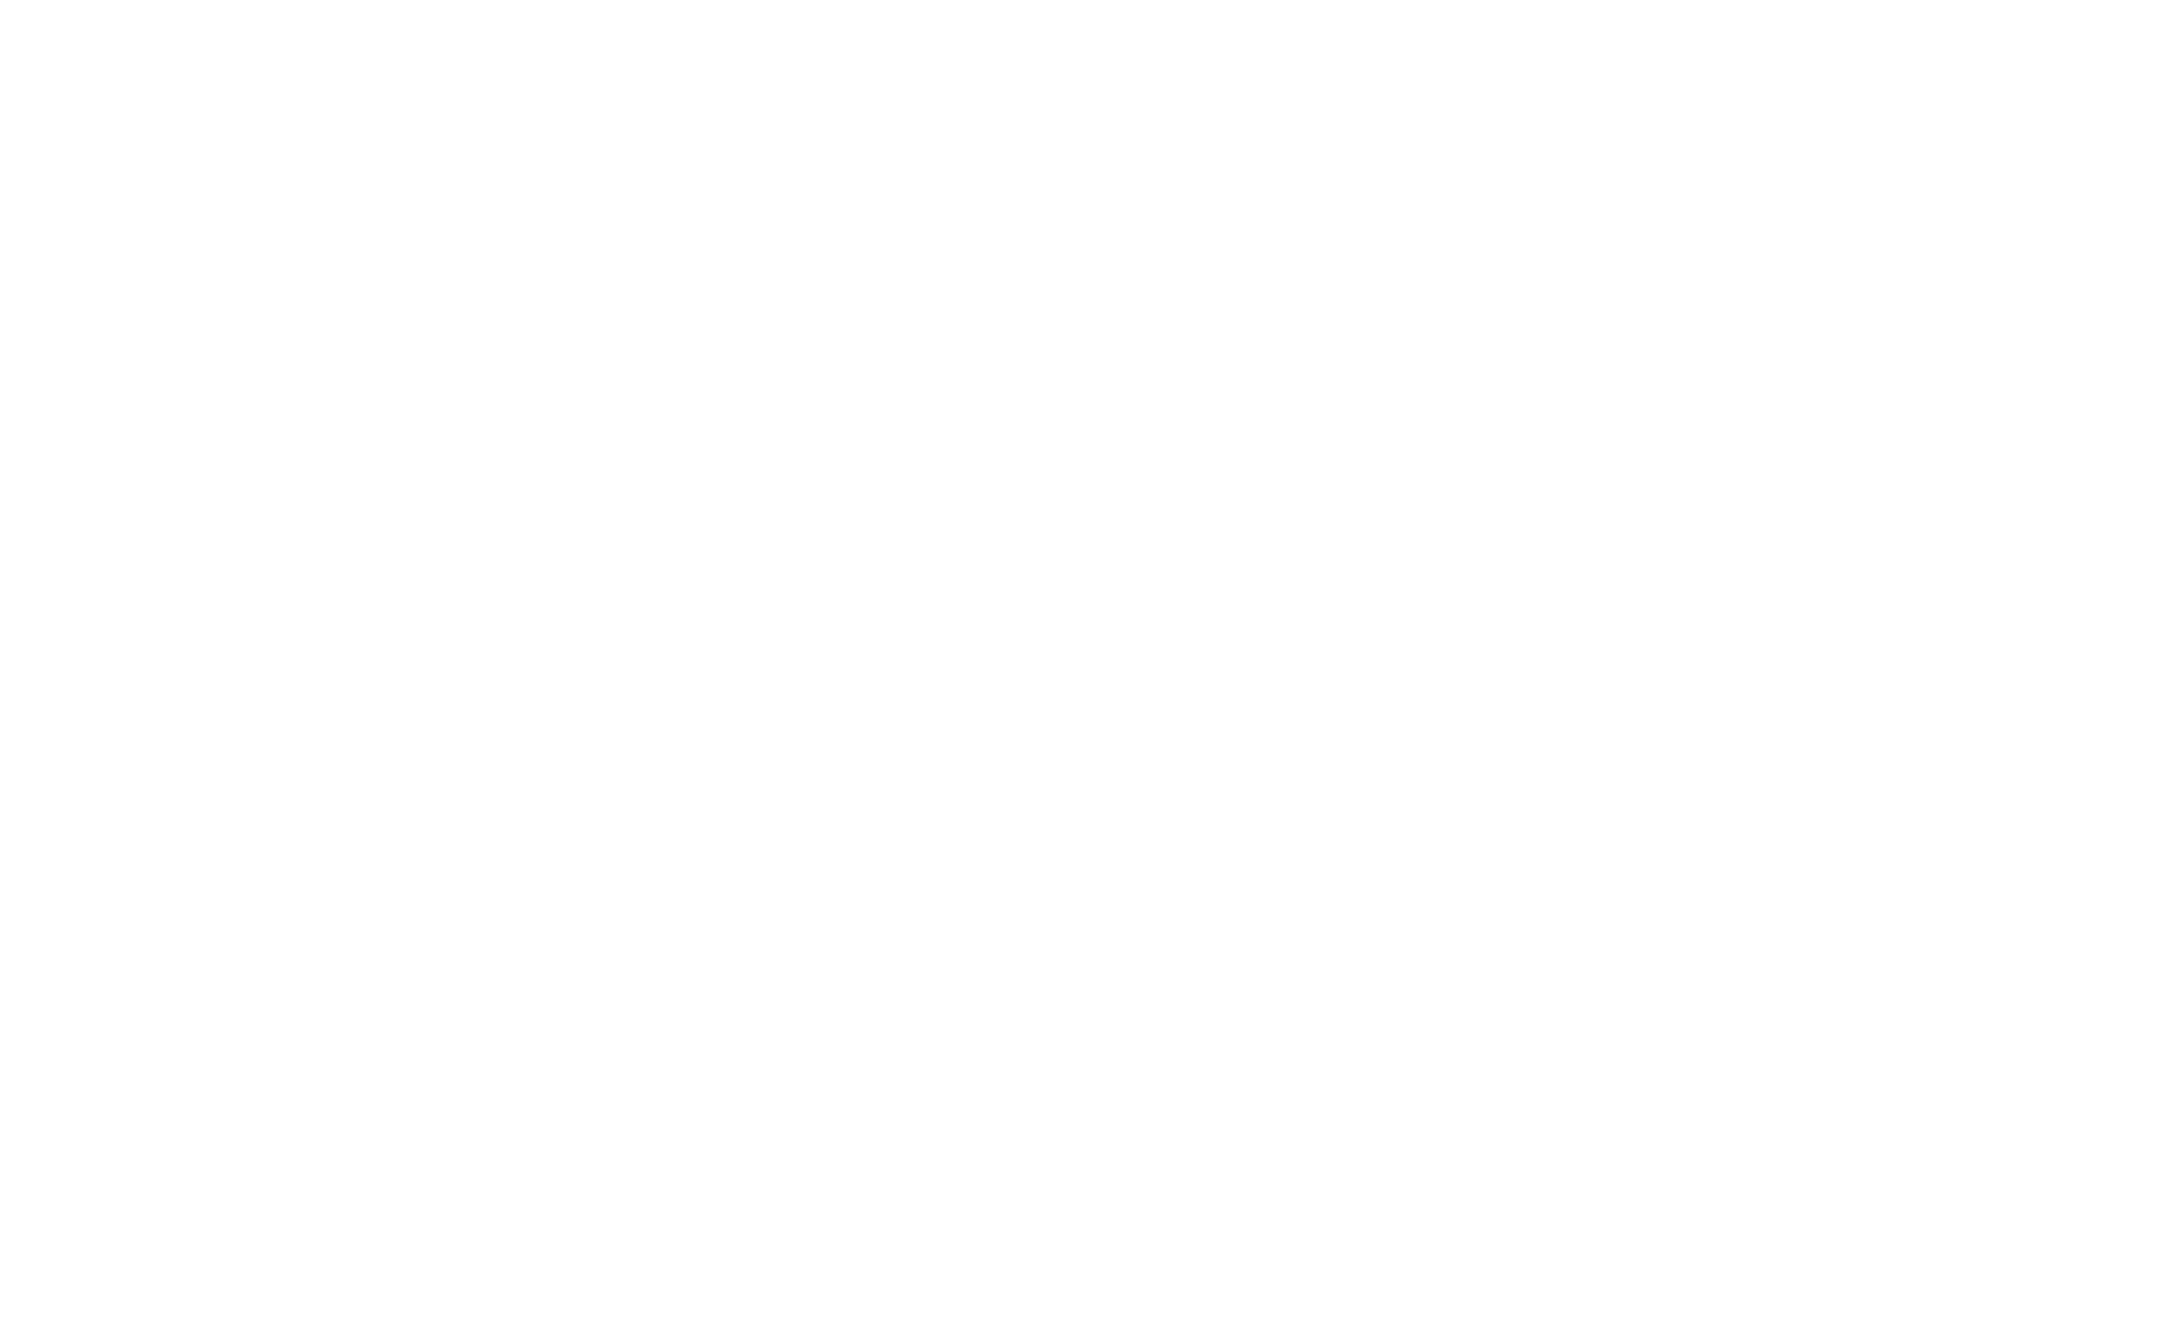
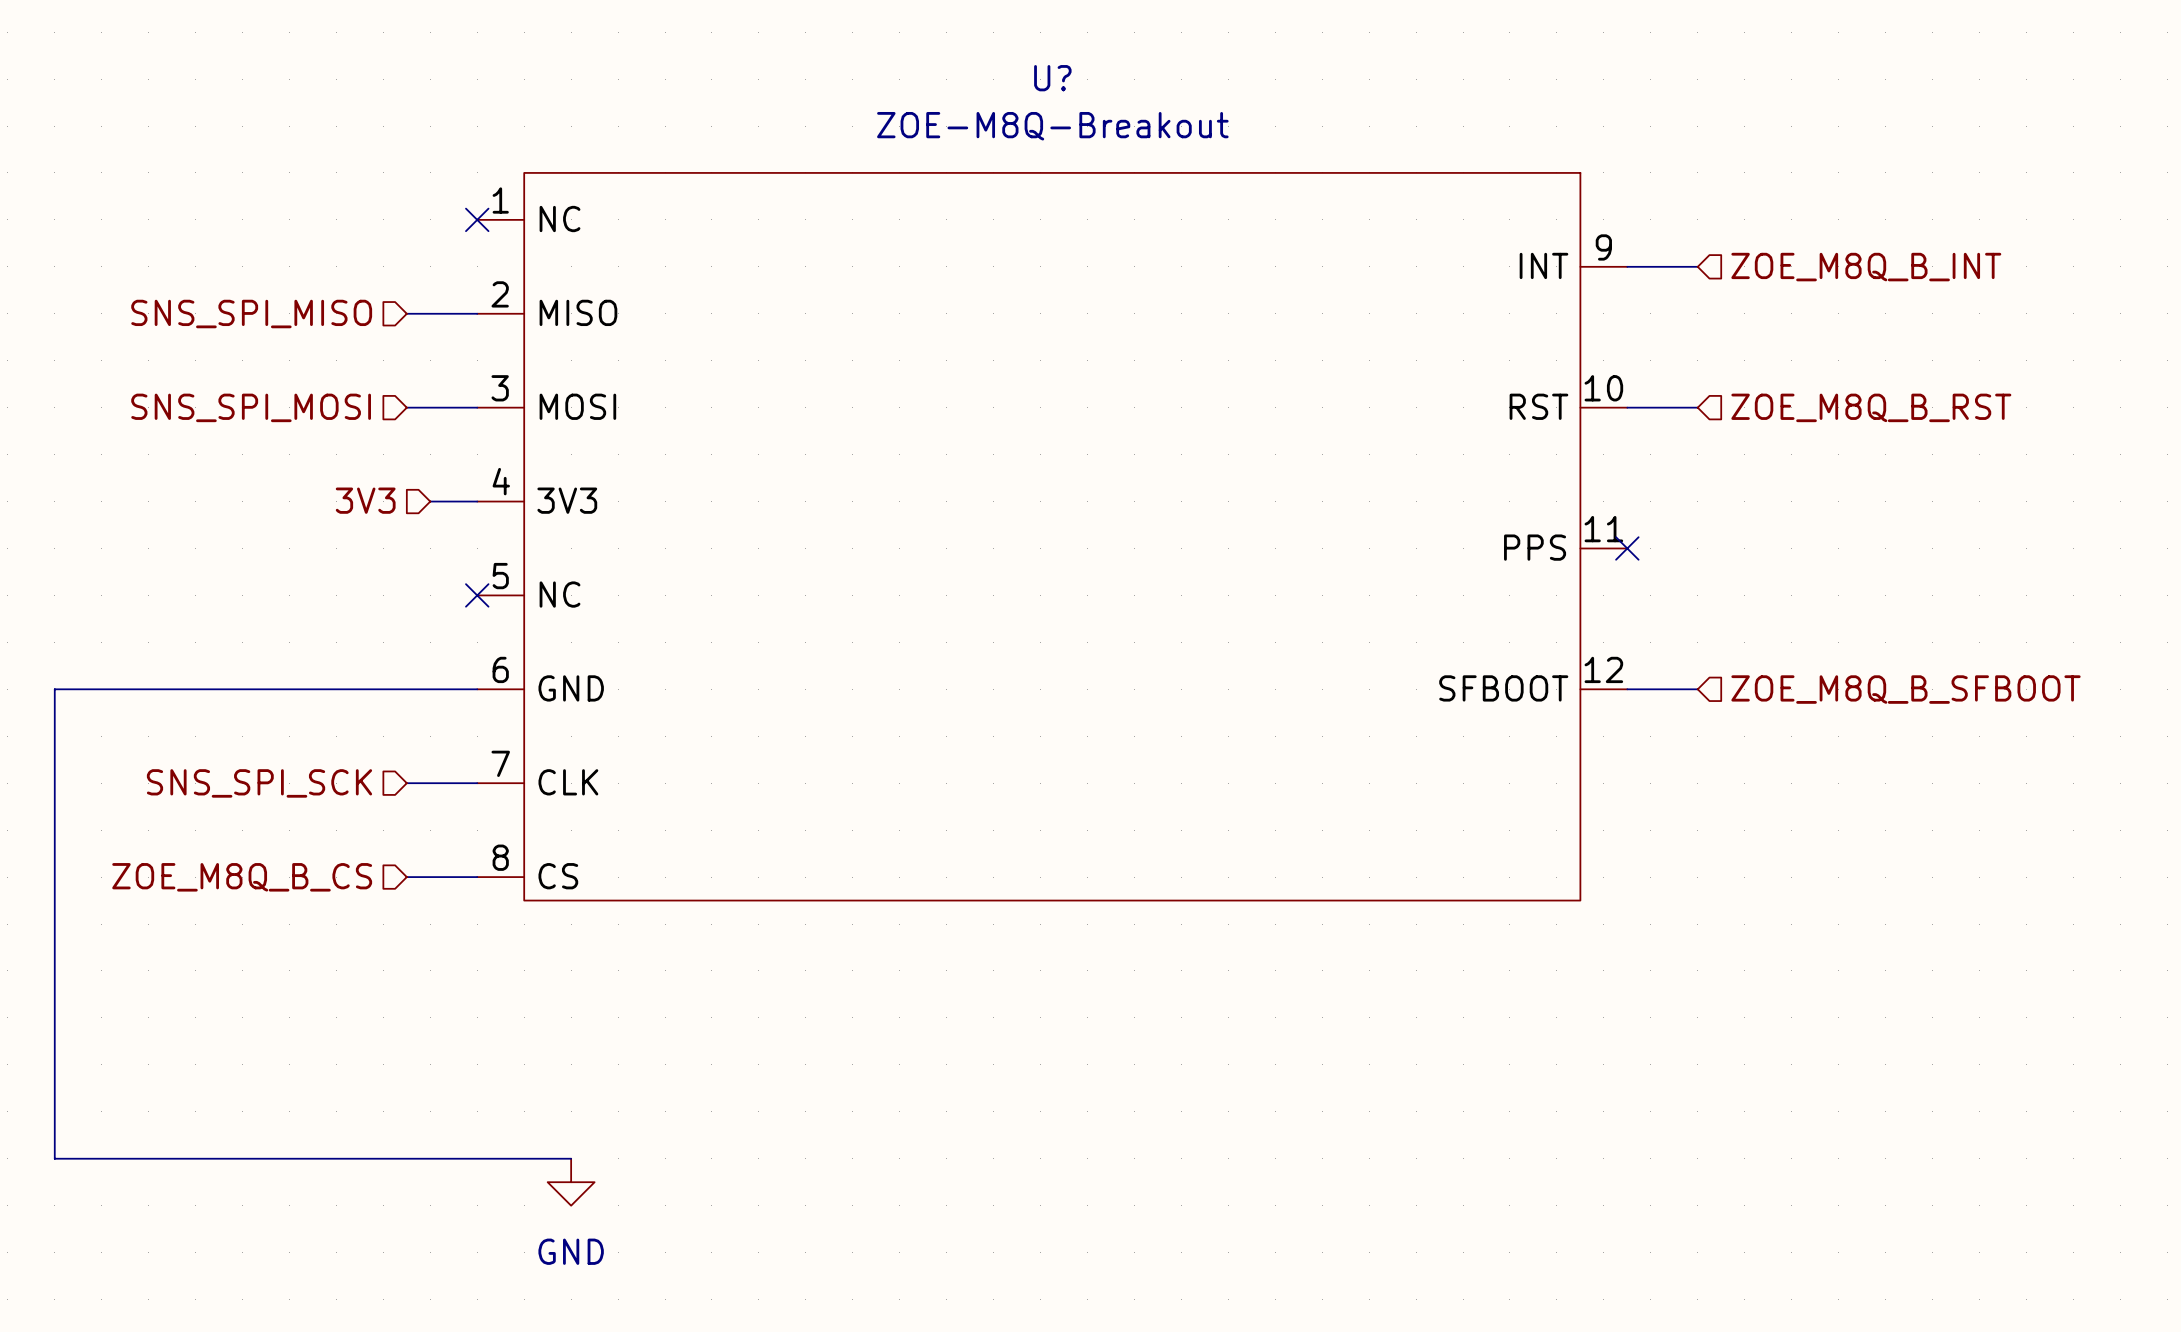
no-connect mark: none -> (477, 219)
wire: none -> (1627, 266) (1697, 266)
hierarchical label: none -> ZOE_M8Q_B_INT (1866, 267)
wire: none -> (406, 313) (477, 313)
hierarchical label: none -> SNS_SPI_MISO (251, 314)
hierarchical label: none -> SNS_SPI_MOSI (251, 407)
wire: none -> (406, 407) (477, 407)
wire: none -> (1627, 407) (1697, 407)
hierarchical label: none -> ZOE_M8Q_B_RST (1871, 407)
hierarchical label: none -> 3V3 (365, 500)
wire: none -> (430, 501) (477, 501)
U?: none -> ZOE-M8Q-Breakout (1052, 536)
no-connect mark: none -> (1627, 548)
no-connect mark: none -> (477, 595)
wire: none -> (477, 689) (54, 689) (54, 1158) (571, 1158)
wire: none -> (1627, 689) (1697, 689)
hierarchical label: none -> ZOE_M8Q_B_SFBOOT (1905, 689)
hierarchical label: none -> SNS_SPI_SCK (259, 783)
wire: none -> (406, 783) (477, 783)
hierarchical label: none -> ZOE_M8Q_B_CS (242, 877)
wire: none -> (406, 877) (477, 877)
power symbol: none -> GND (571, 1182)

